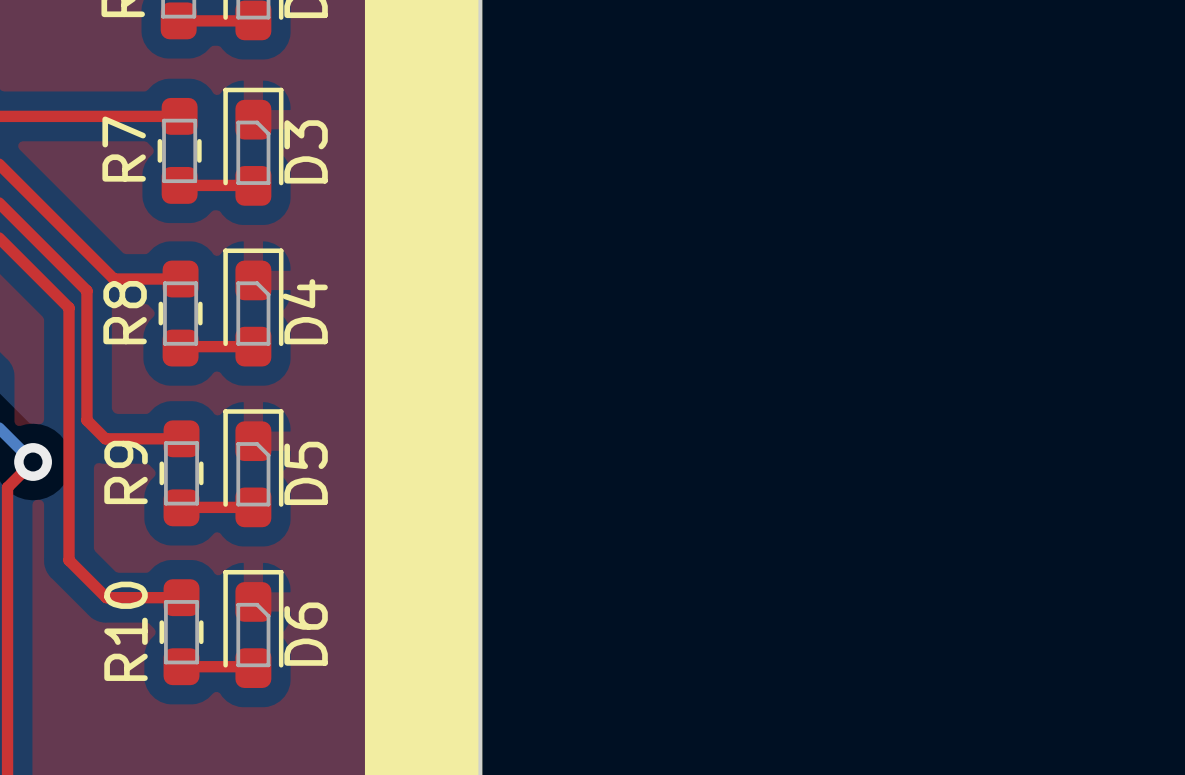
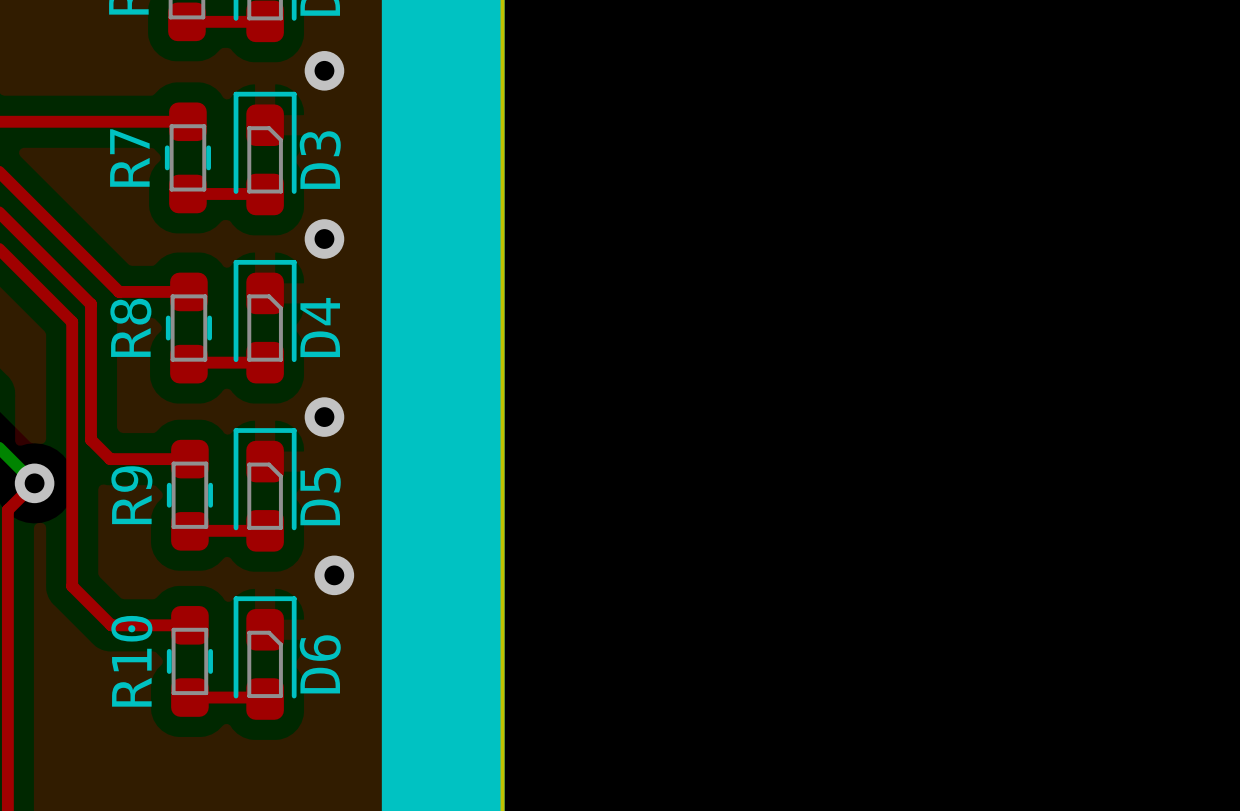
via: none -> (324, 70)
via: none -> (324, 239)
via: none -> (324, 417)
via: none -> (334, 575)

